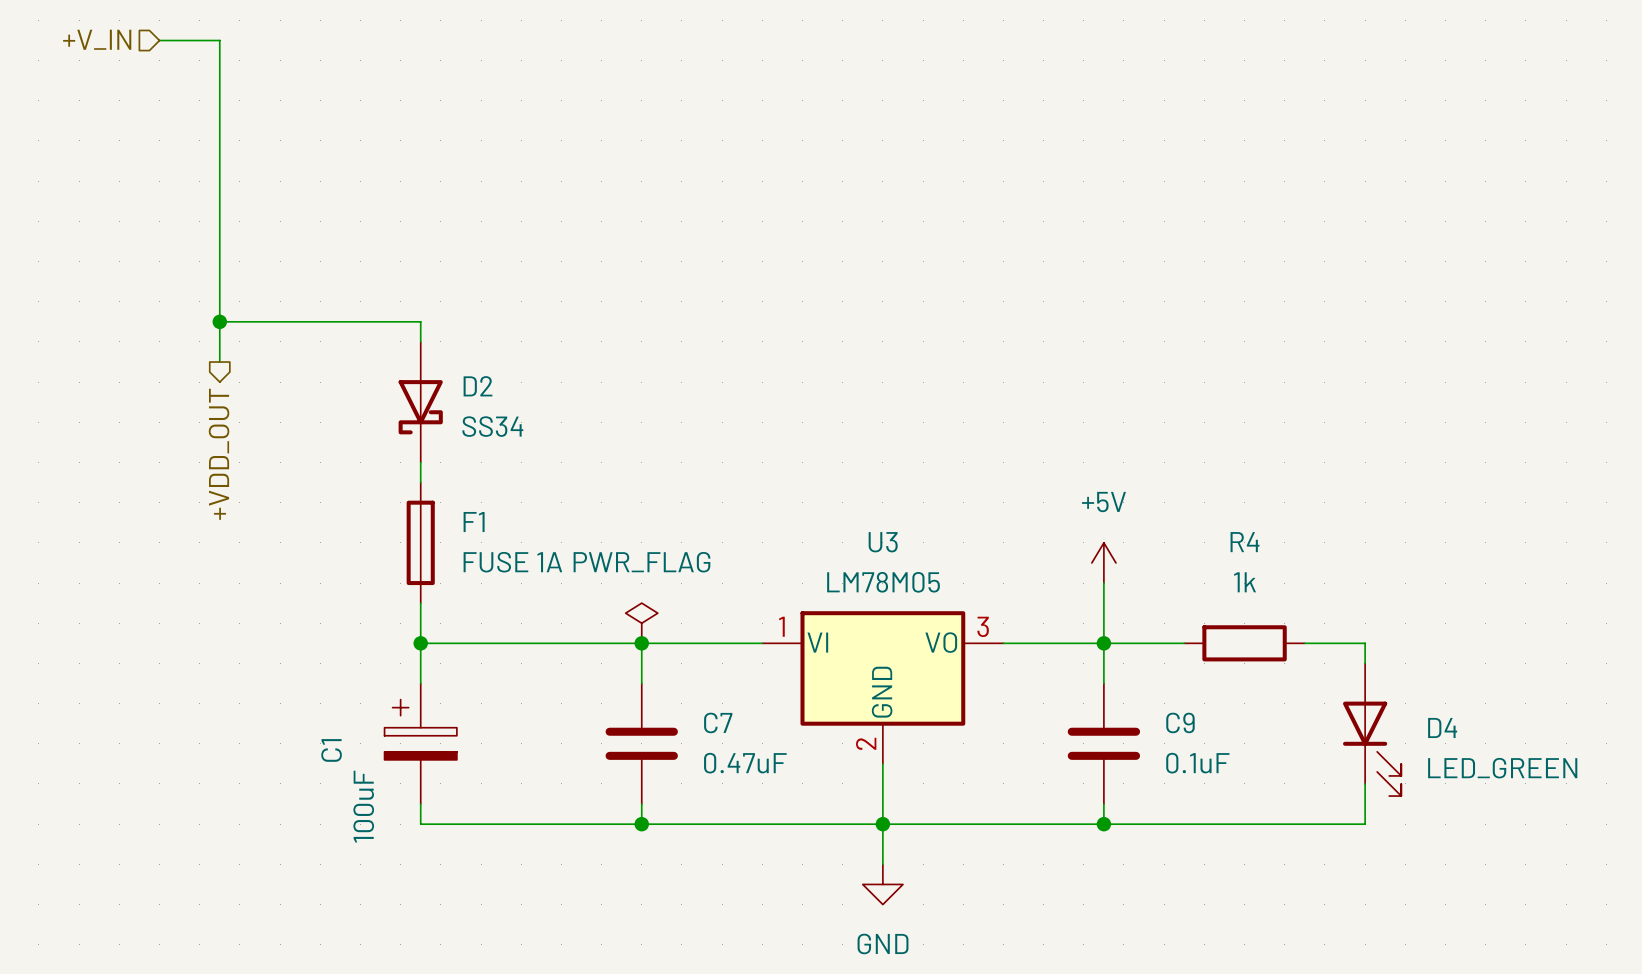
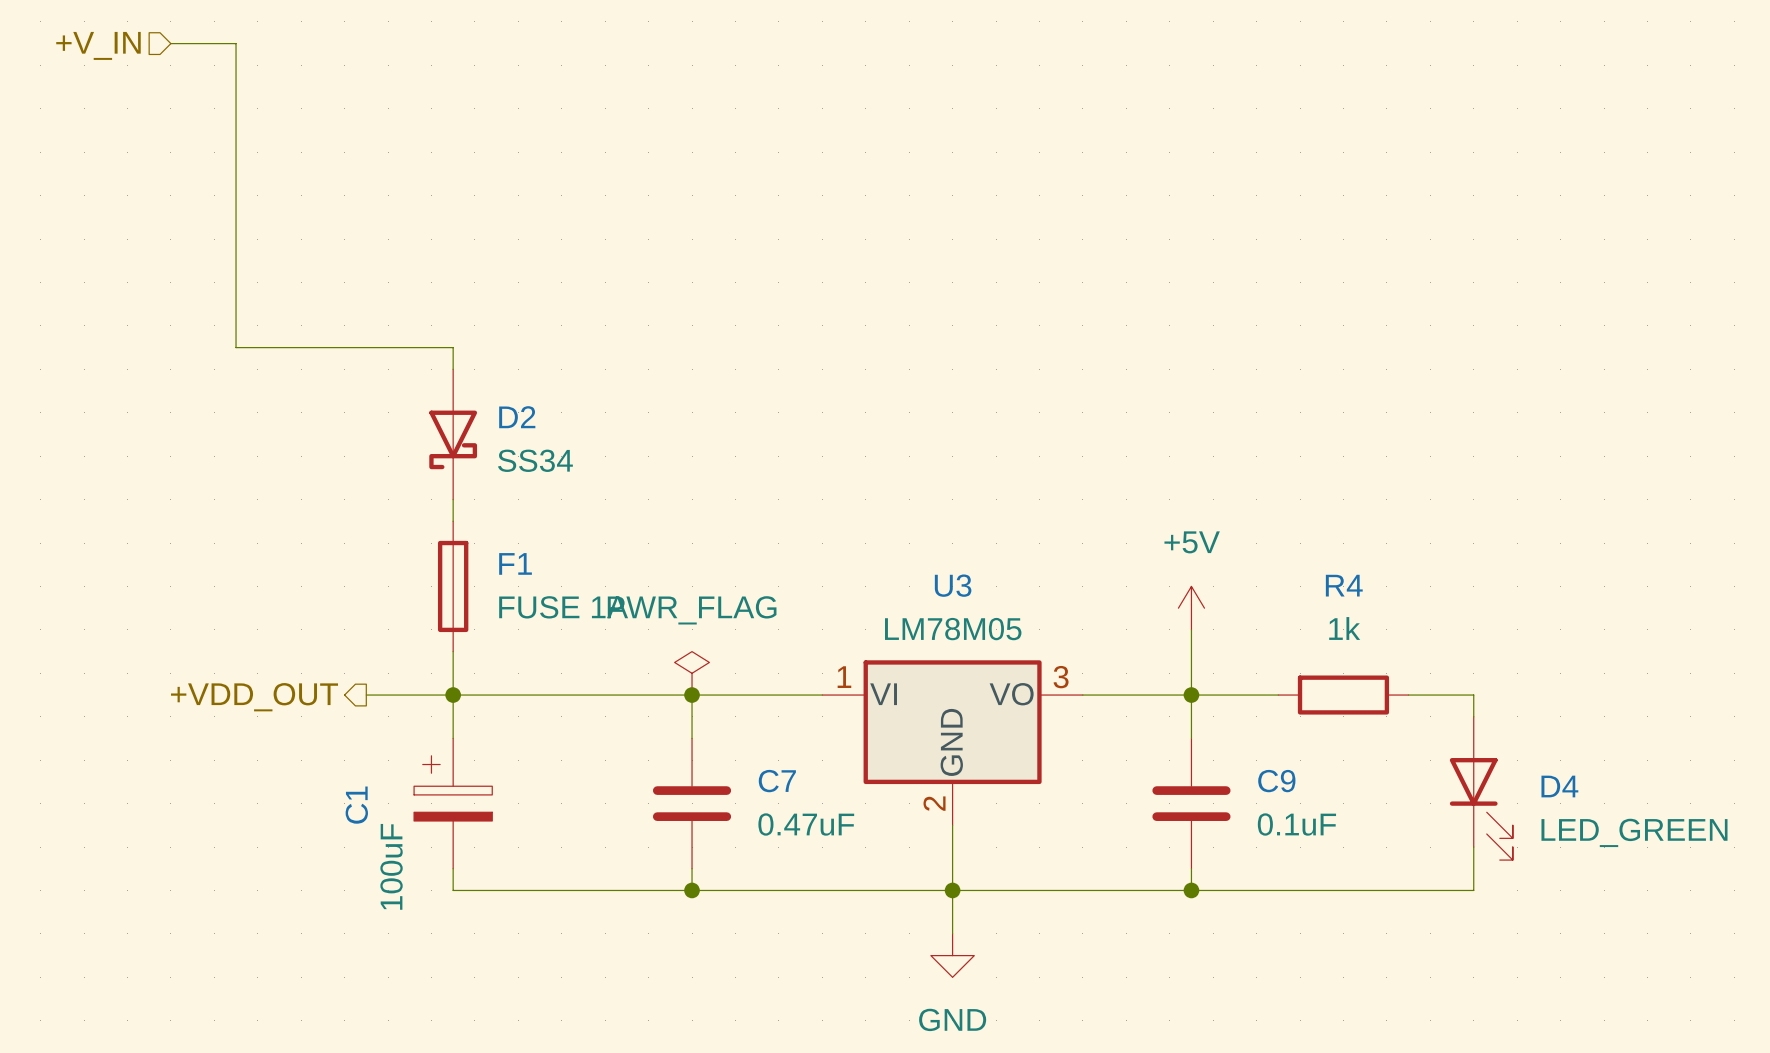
wire: (219, 321) (219, 362) -> none
junction: (219, 321) -> none
hierarchical label rotation: 0° (219, 454) -> 90° clockwise (254, 697)
wire: none -> (366, 695) (453, 695)

